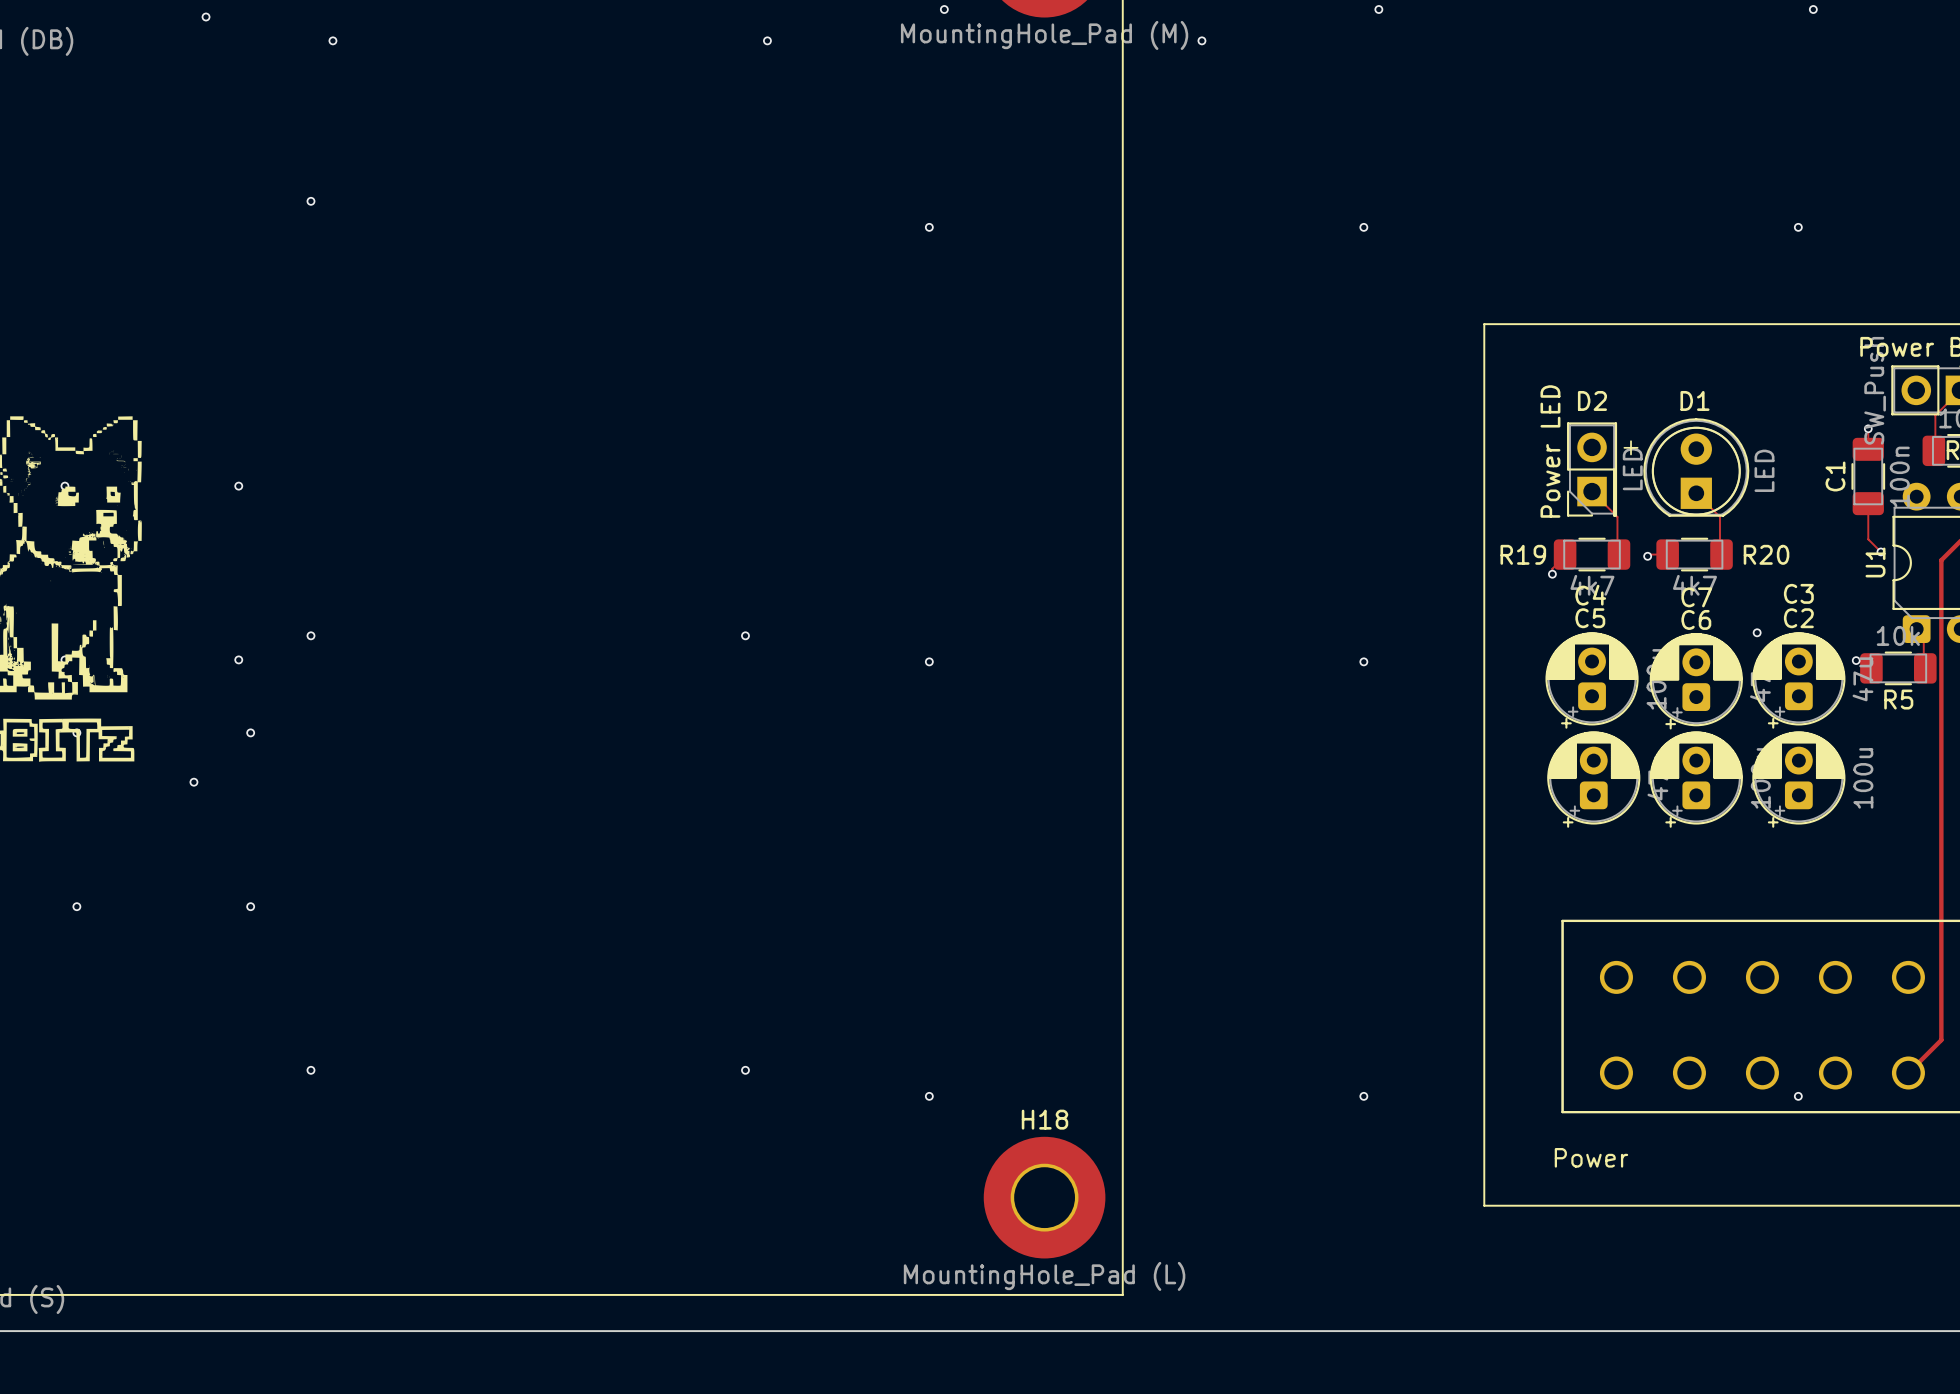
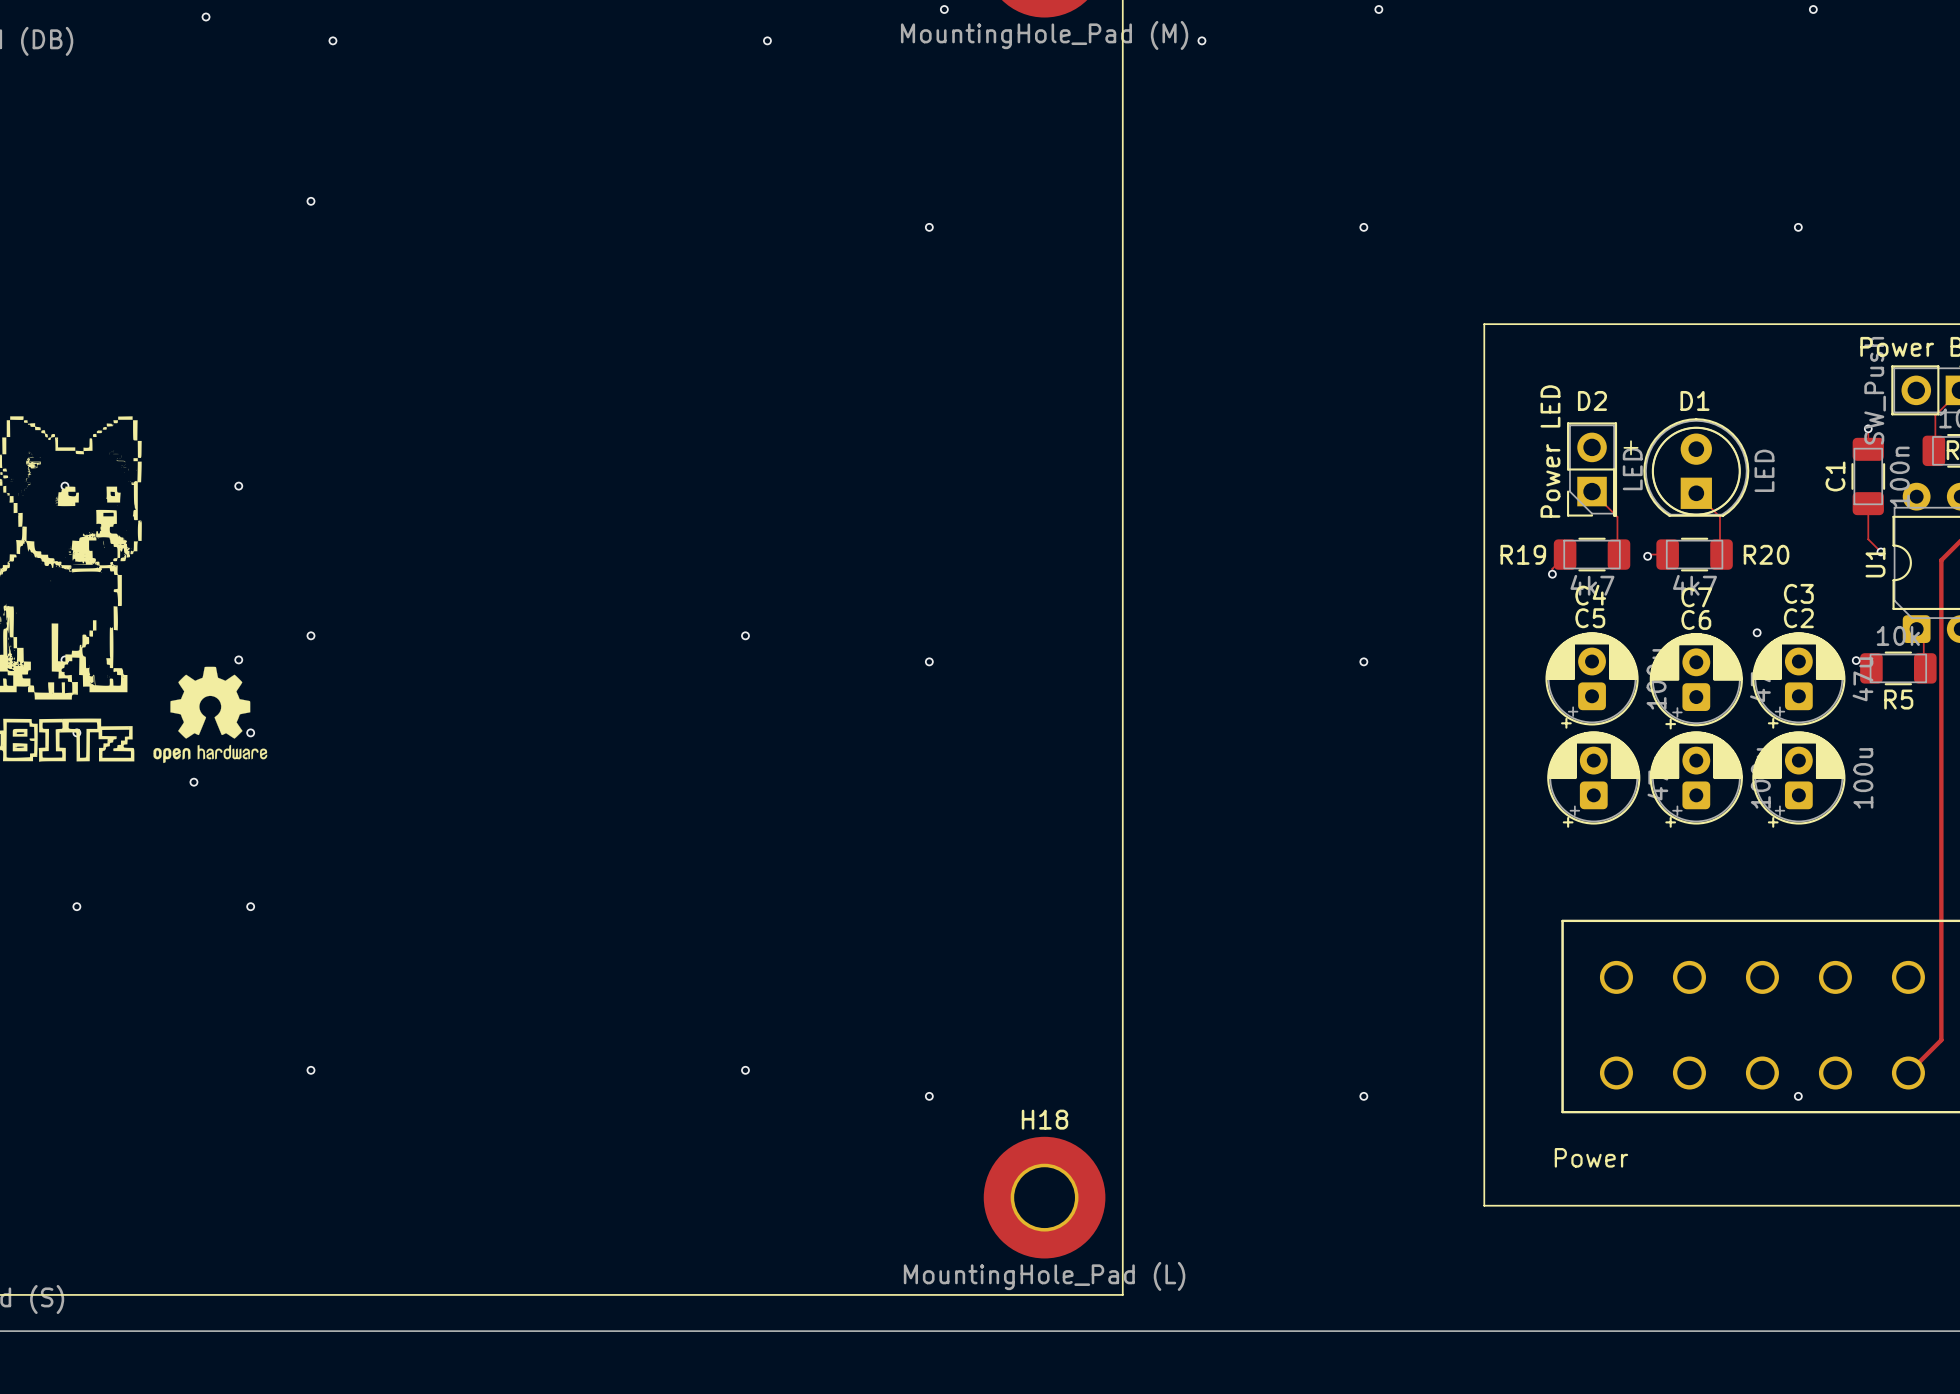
drawing: none -> [153, 666, 268, 764]

